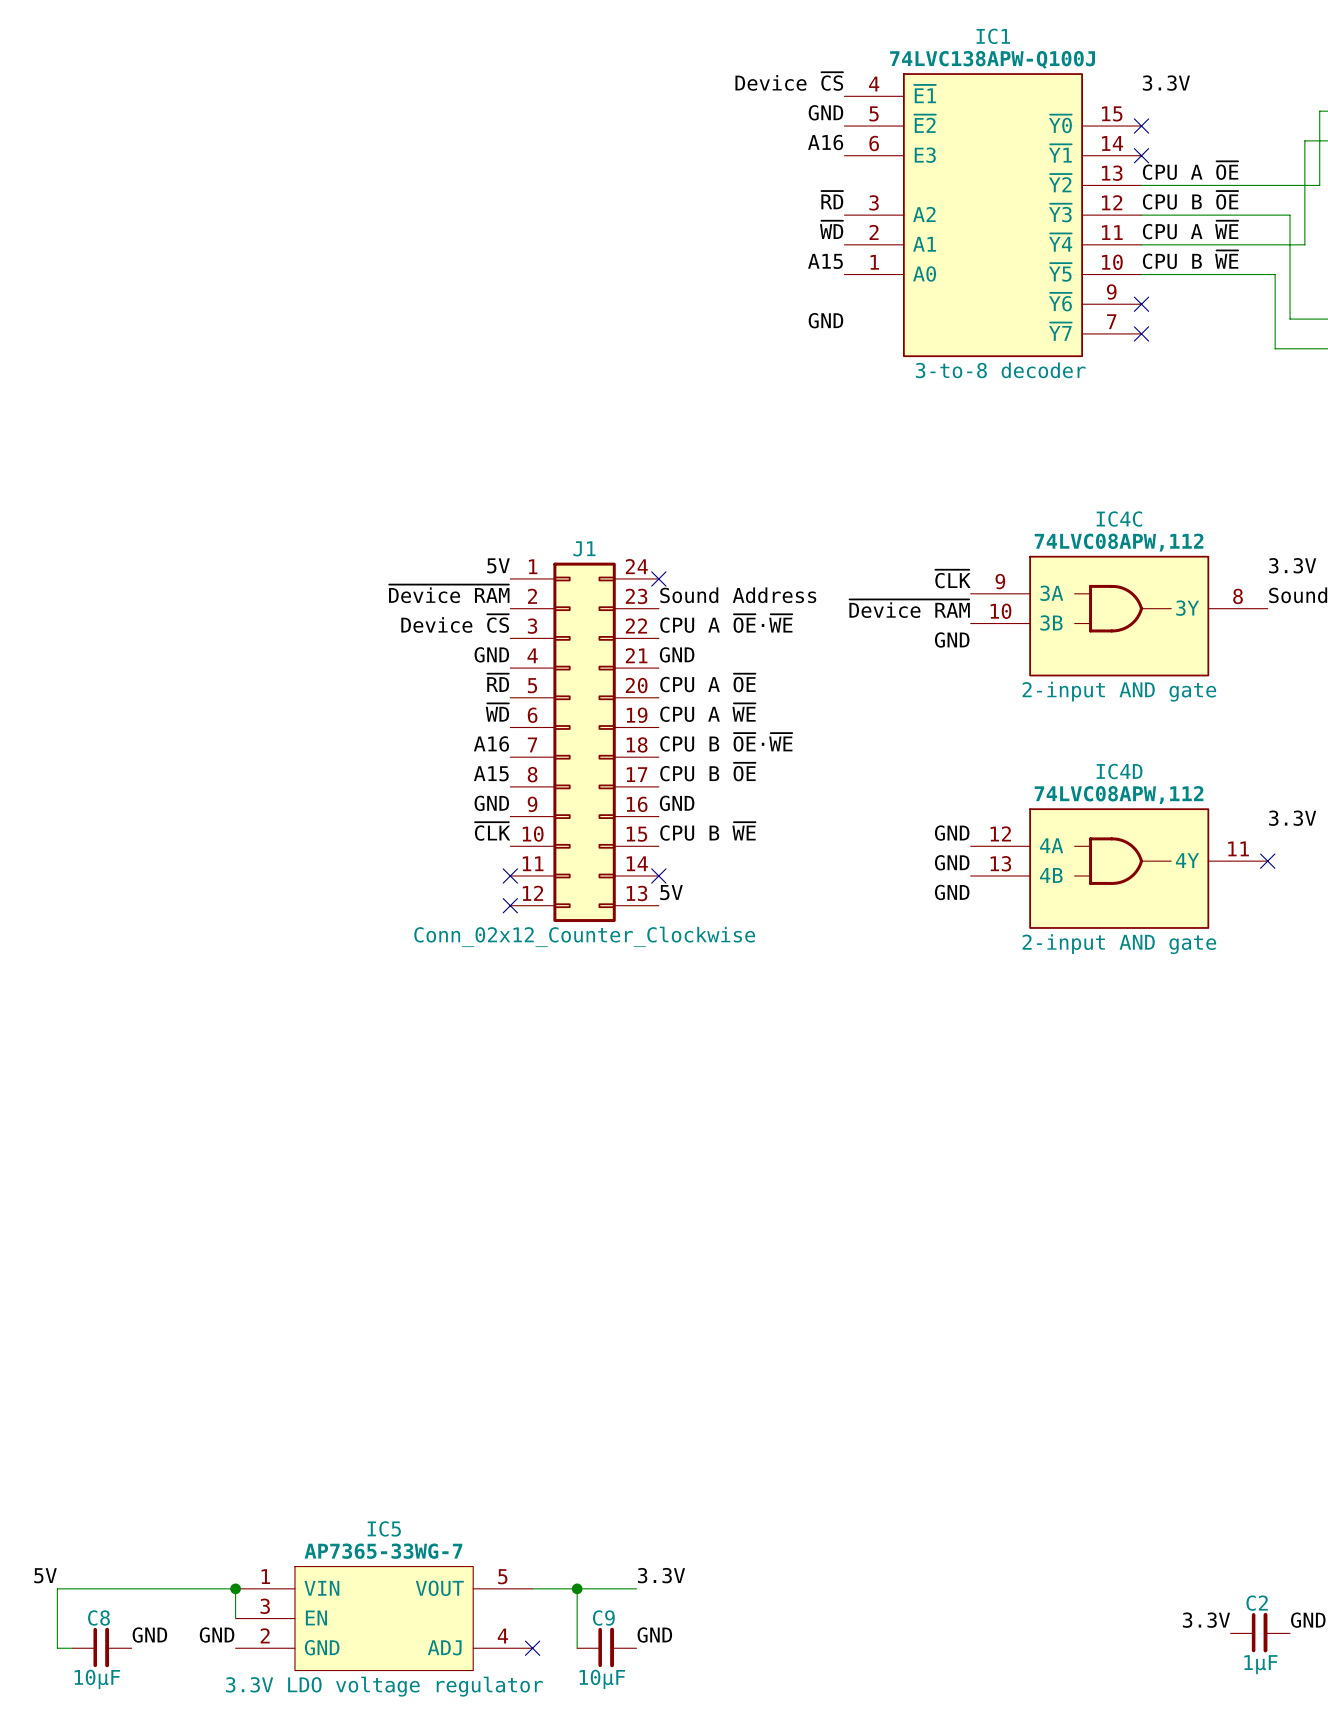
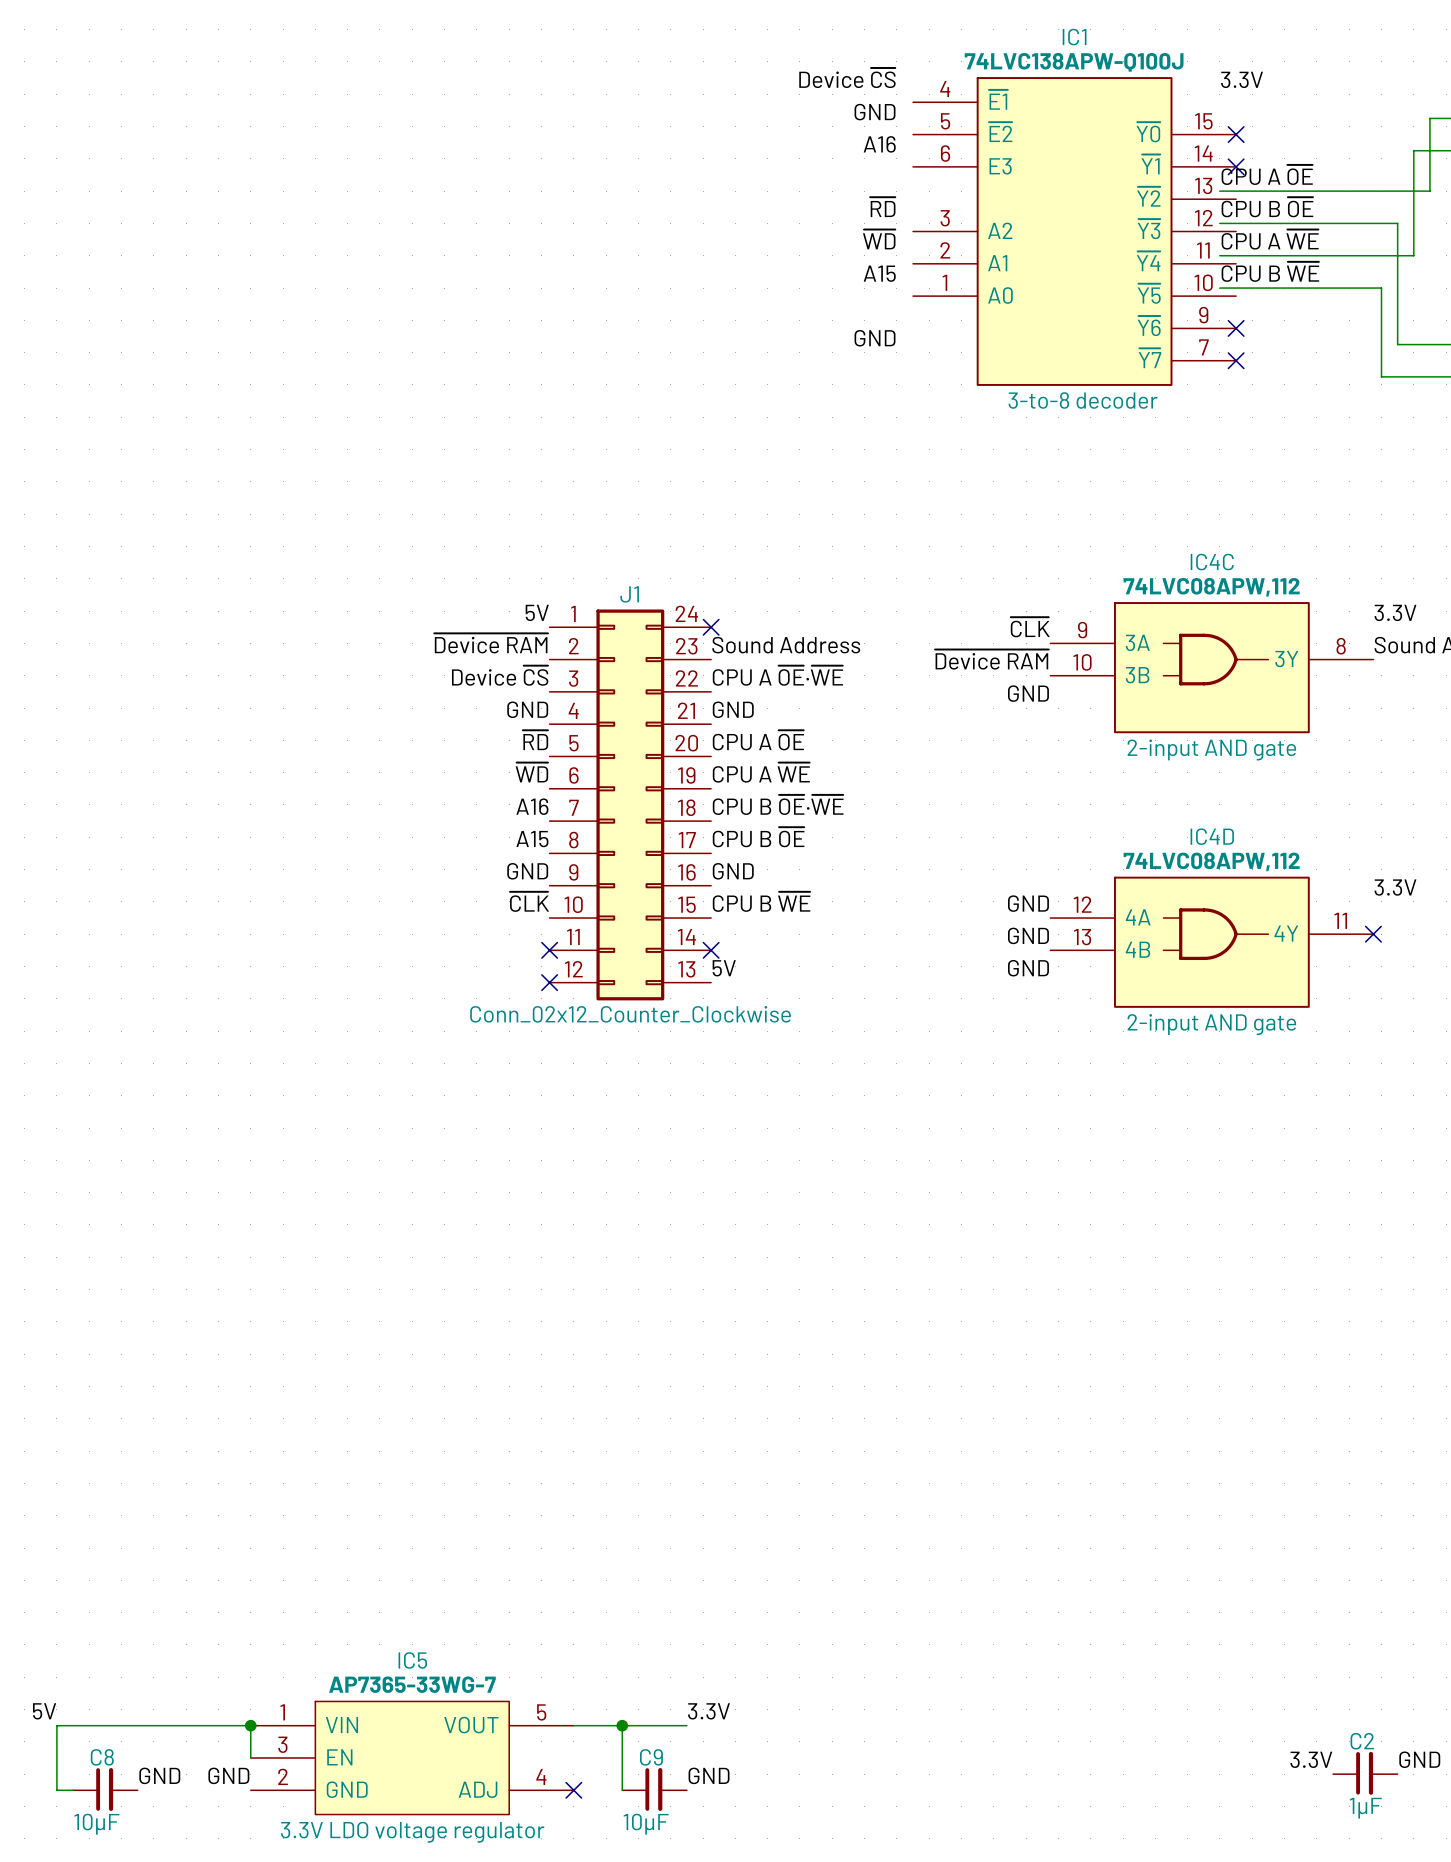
label position: Device ~{CS} (789, 81) -> Device ~{CS} (847, 78)
label position: 3.3V (1166, 83) -> 3.3V (1242, 79)
label position: GND (825, 112) -> GND (875, 112)
label position: A16 (825, 142) -> A16 (879, 144)
label position: CPU A ~{OE} (1190, 170) -> CPU A ~{OE} (1267, 174)
wire: (1319, 178) (1319, 185) (1141, 185) -> (1429, 191) (1219, 191)
label position: ~{RD} (832, 200) -> ~{RD} (882, 207)
label position: CPU B ~{OE} (1190, 200) -> CPU B ~{OE} (1267, 207)
wire: (1141, 215) (1290, 215) -> (1219, 223) (1397, 223) (1397, 231)
label position: ~{WD} (831, 229) -> ~{WD} (879, 239)
label position: CPU A ~{WE} (1190, 230) -> CPU A ~{WE} (1270, 239)
wire: (1304, 237) (1304, 244) (1141, 244) -> (1413, 255) (1219, 255)
label position: CPU B ~{WE} (1190, 259) -> CPU B ~{WE} (1270, 271)
label position: A15 (825, 261) -> A15 (879, 273)
wire: (1141, 274) (1275, 274) -> (1219, 288) (1381, 288) (1381, 296)
label position: GND (825, 320) -> GND (875, 338)

